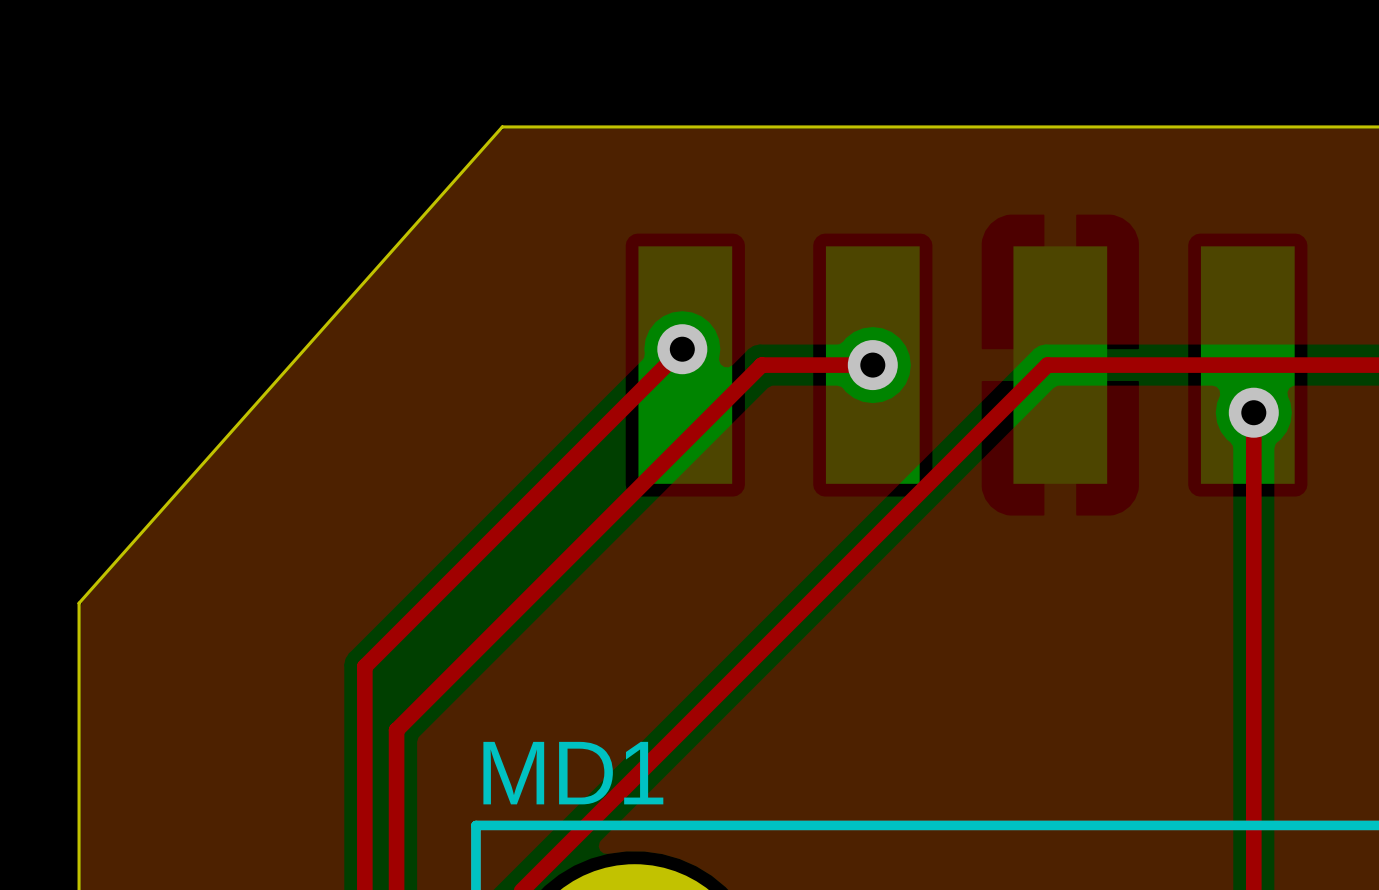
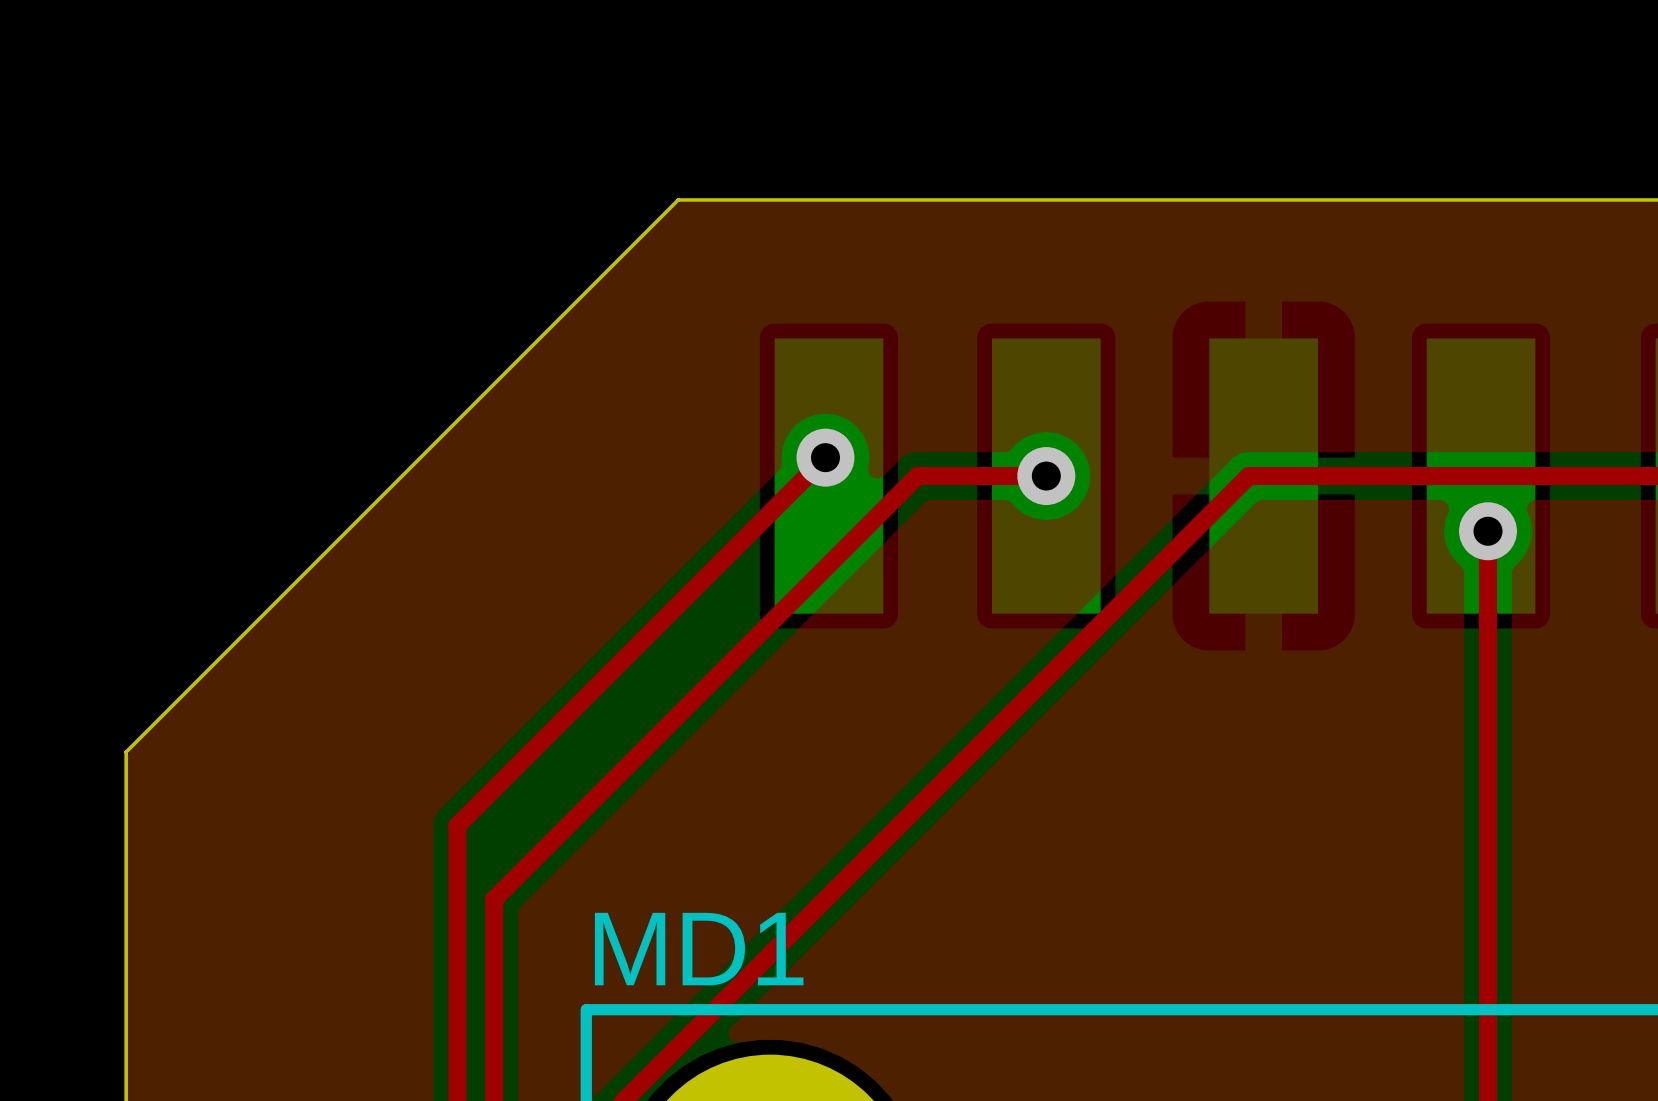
board edge: (555, 126) (502, 126) (79, 603) -> (678, 199) (126, 752)

